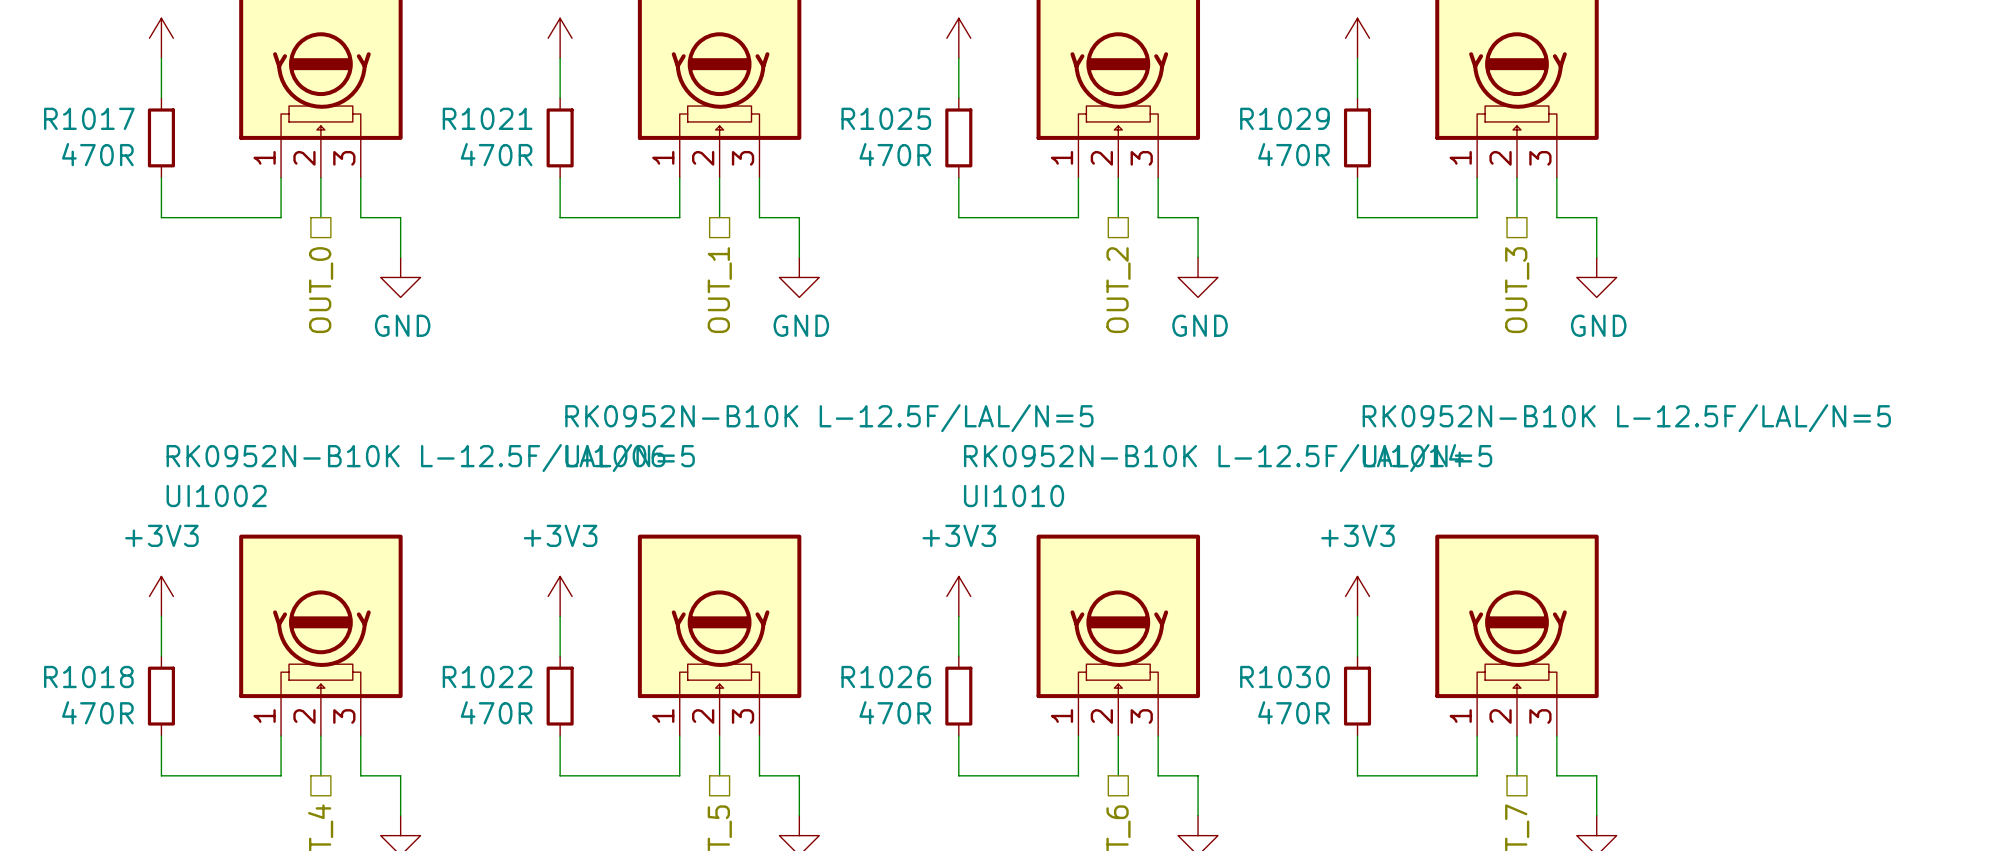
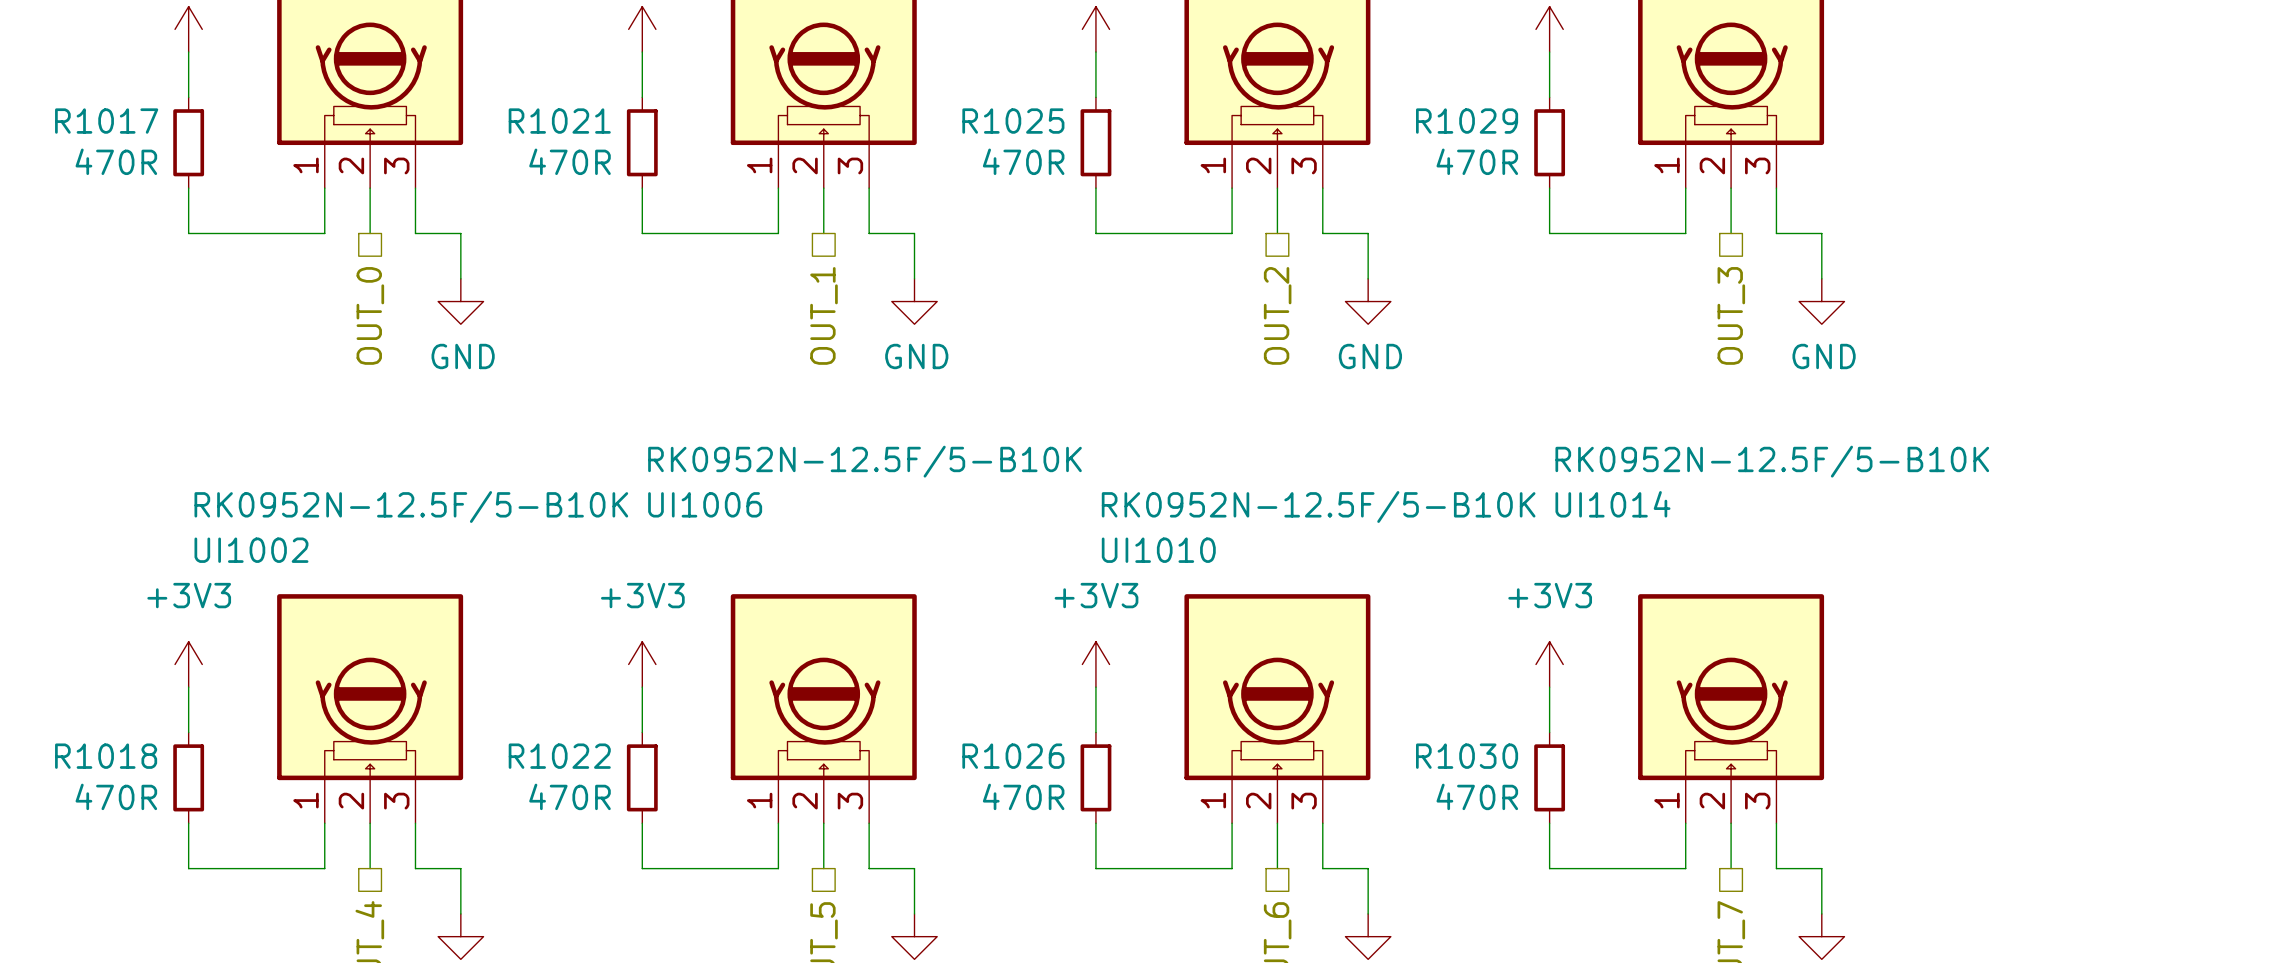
UI1006 value: RK0952N-B10K L-12.5F/LAL/N=5 (829, 418) -> RK0952N-12.5F/5-B10K (864, 461)
UI1014 value: RK0952N-B10K L-12.5F/LAL/N=5 (1626, 418) -> RK0952N-12.5F/5-B10K (1772, 461)
UI1002 value: RK0952N-B10K L-12.5F/LAL/N=5 (430, 458) -> RK0952N-12.5F/5-B10K (411, 507)
UI1010 value: RK0952N-B10K L-12.5F/LAL/N=5 (1228, 458) -> RK0952N-12.5F/5-B10K (1318, 507)

